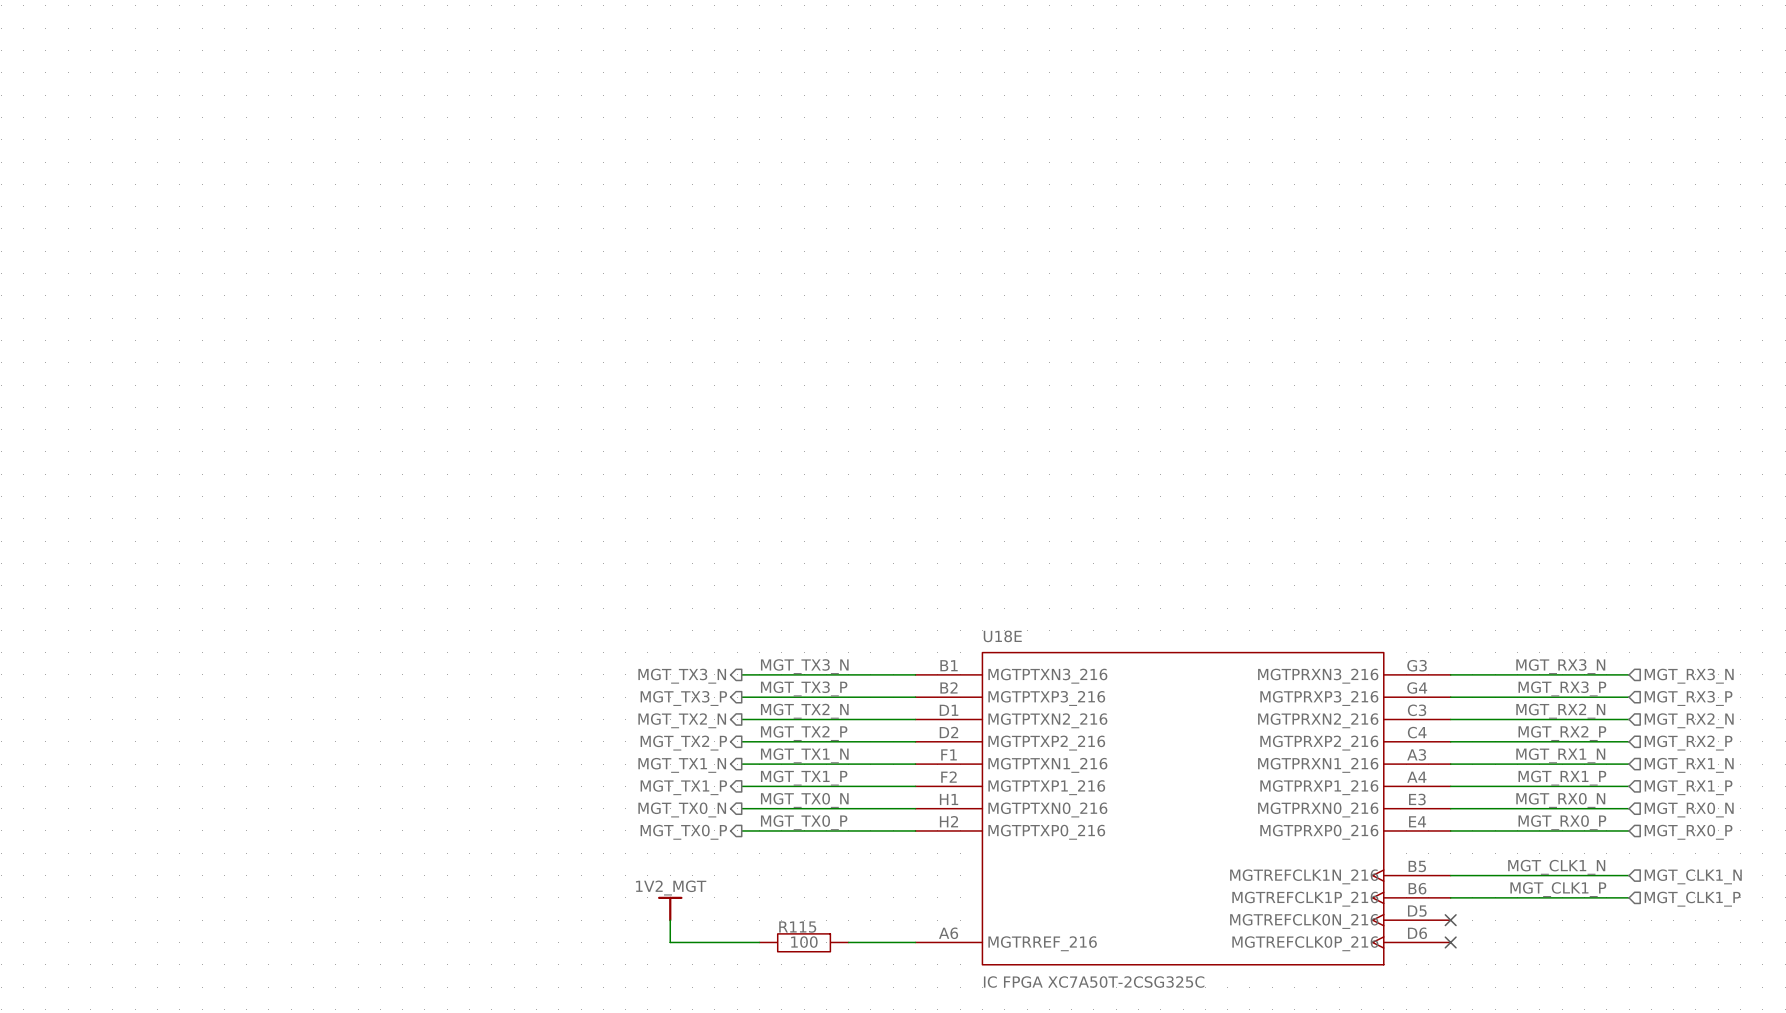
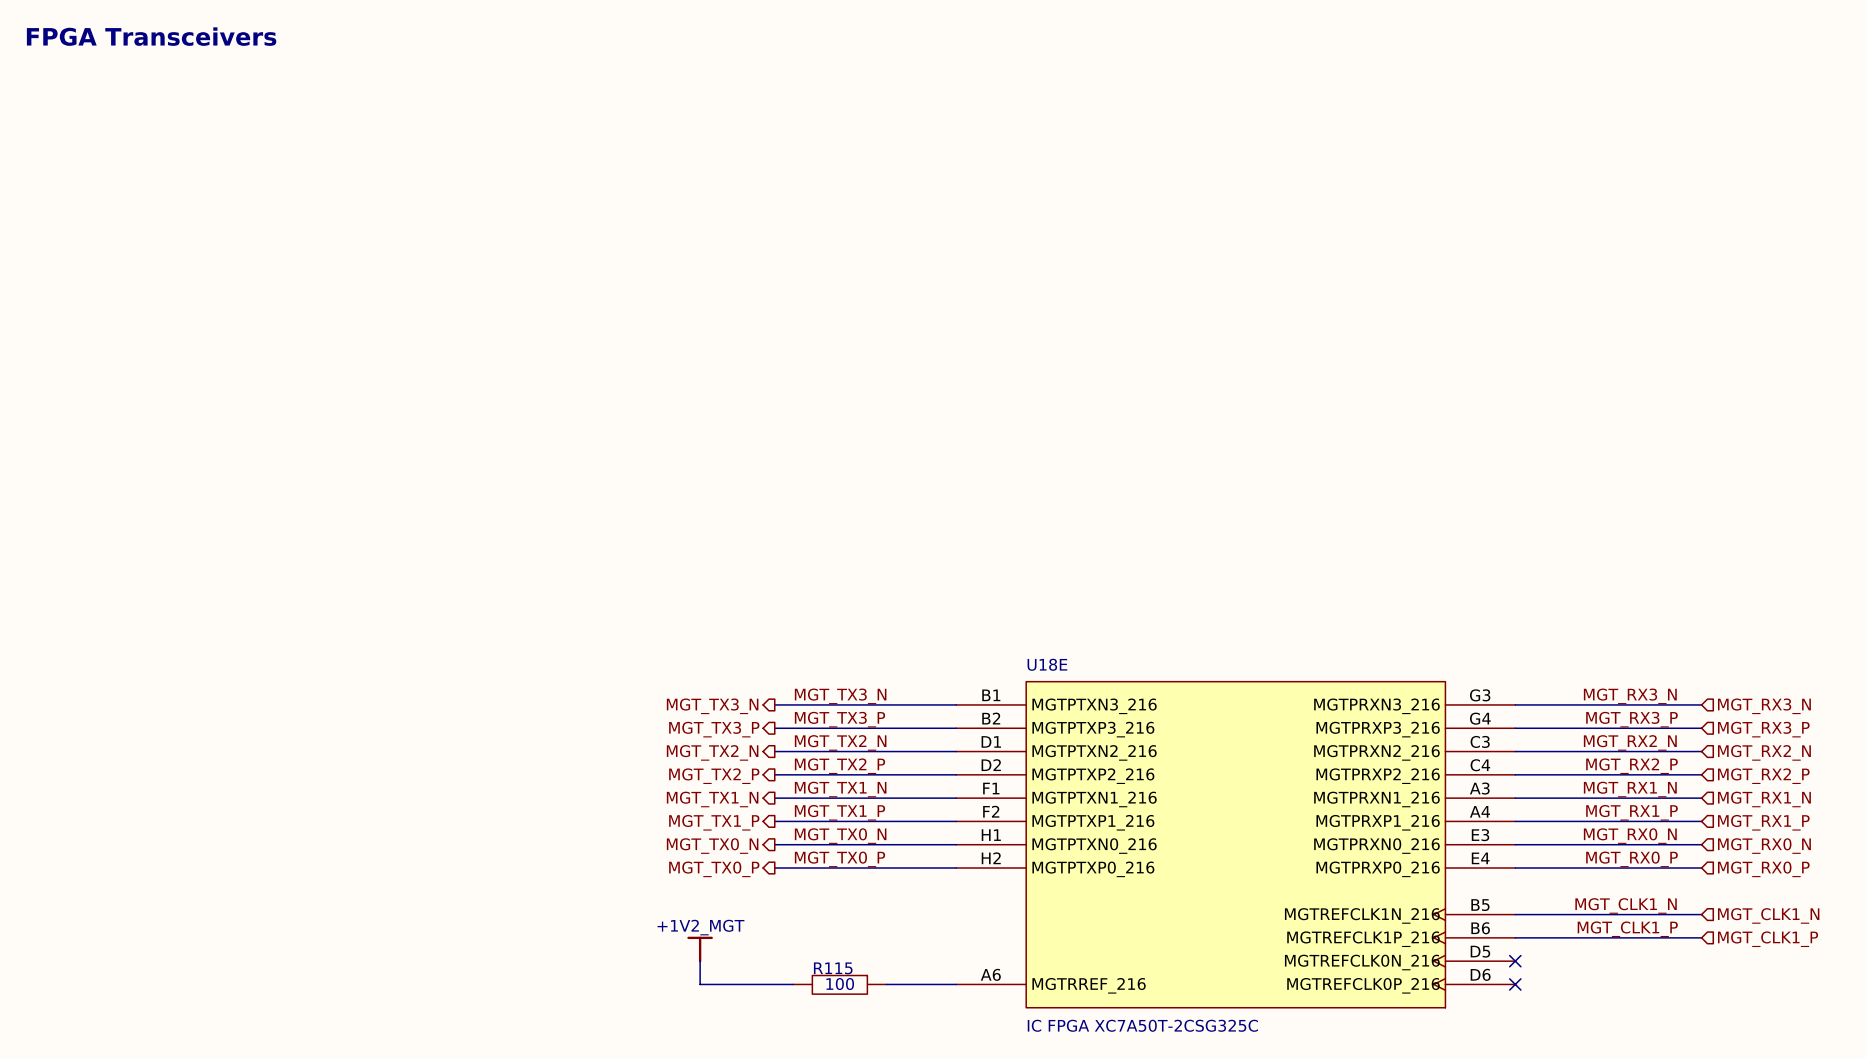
text: none -> FPGA Transceivers (151, 36)
power symbol: 1V2_MGT (670, 909) -> +1V2_MGT (700, 949)

